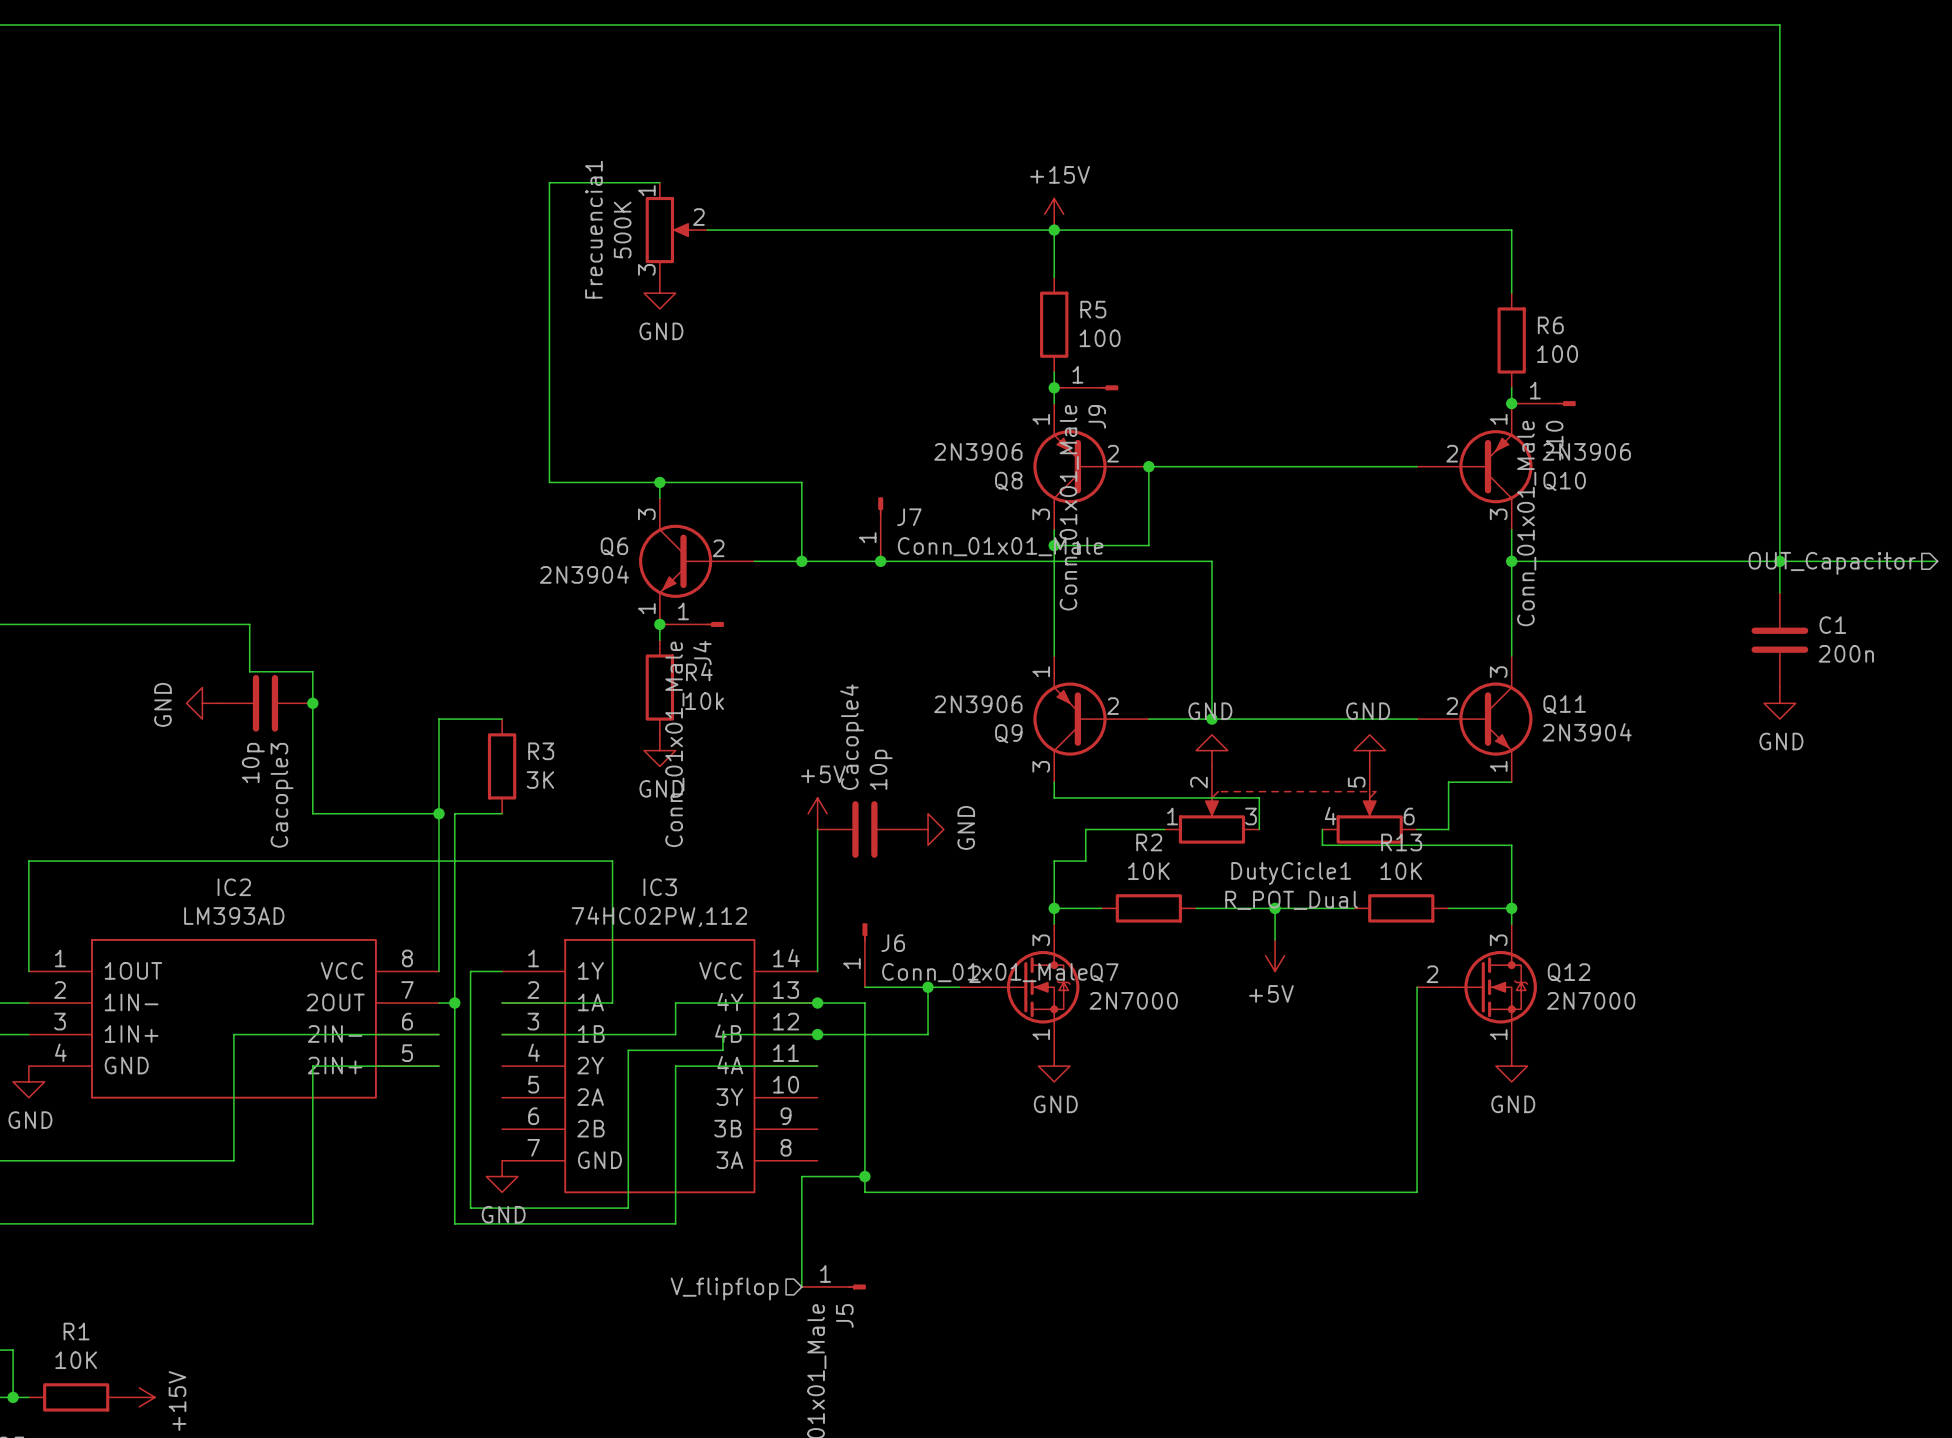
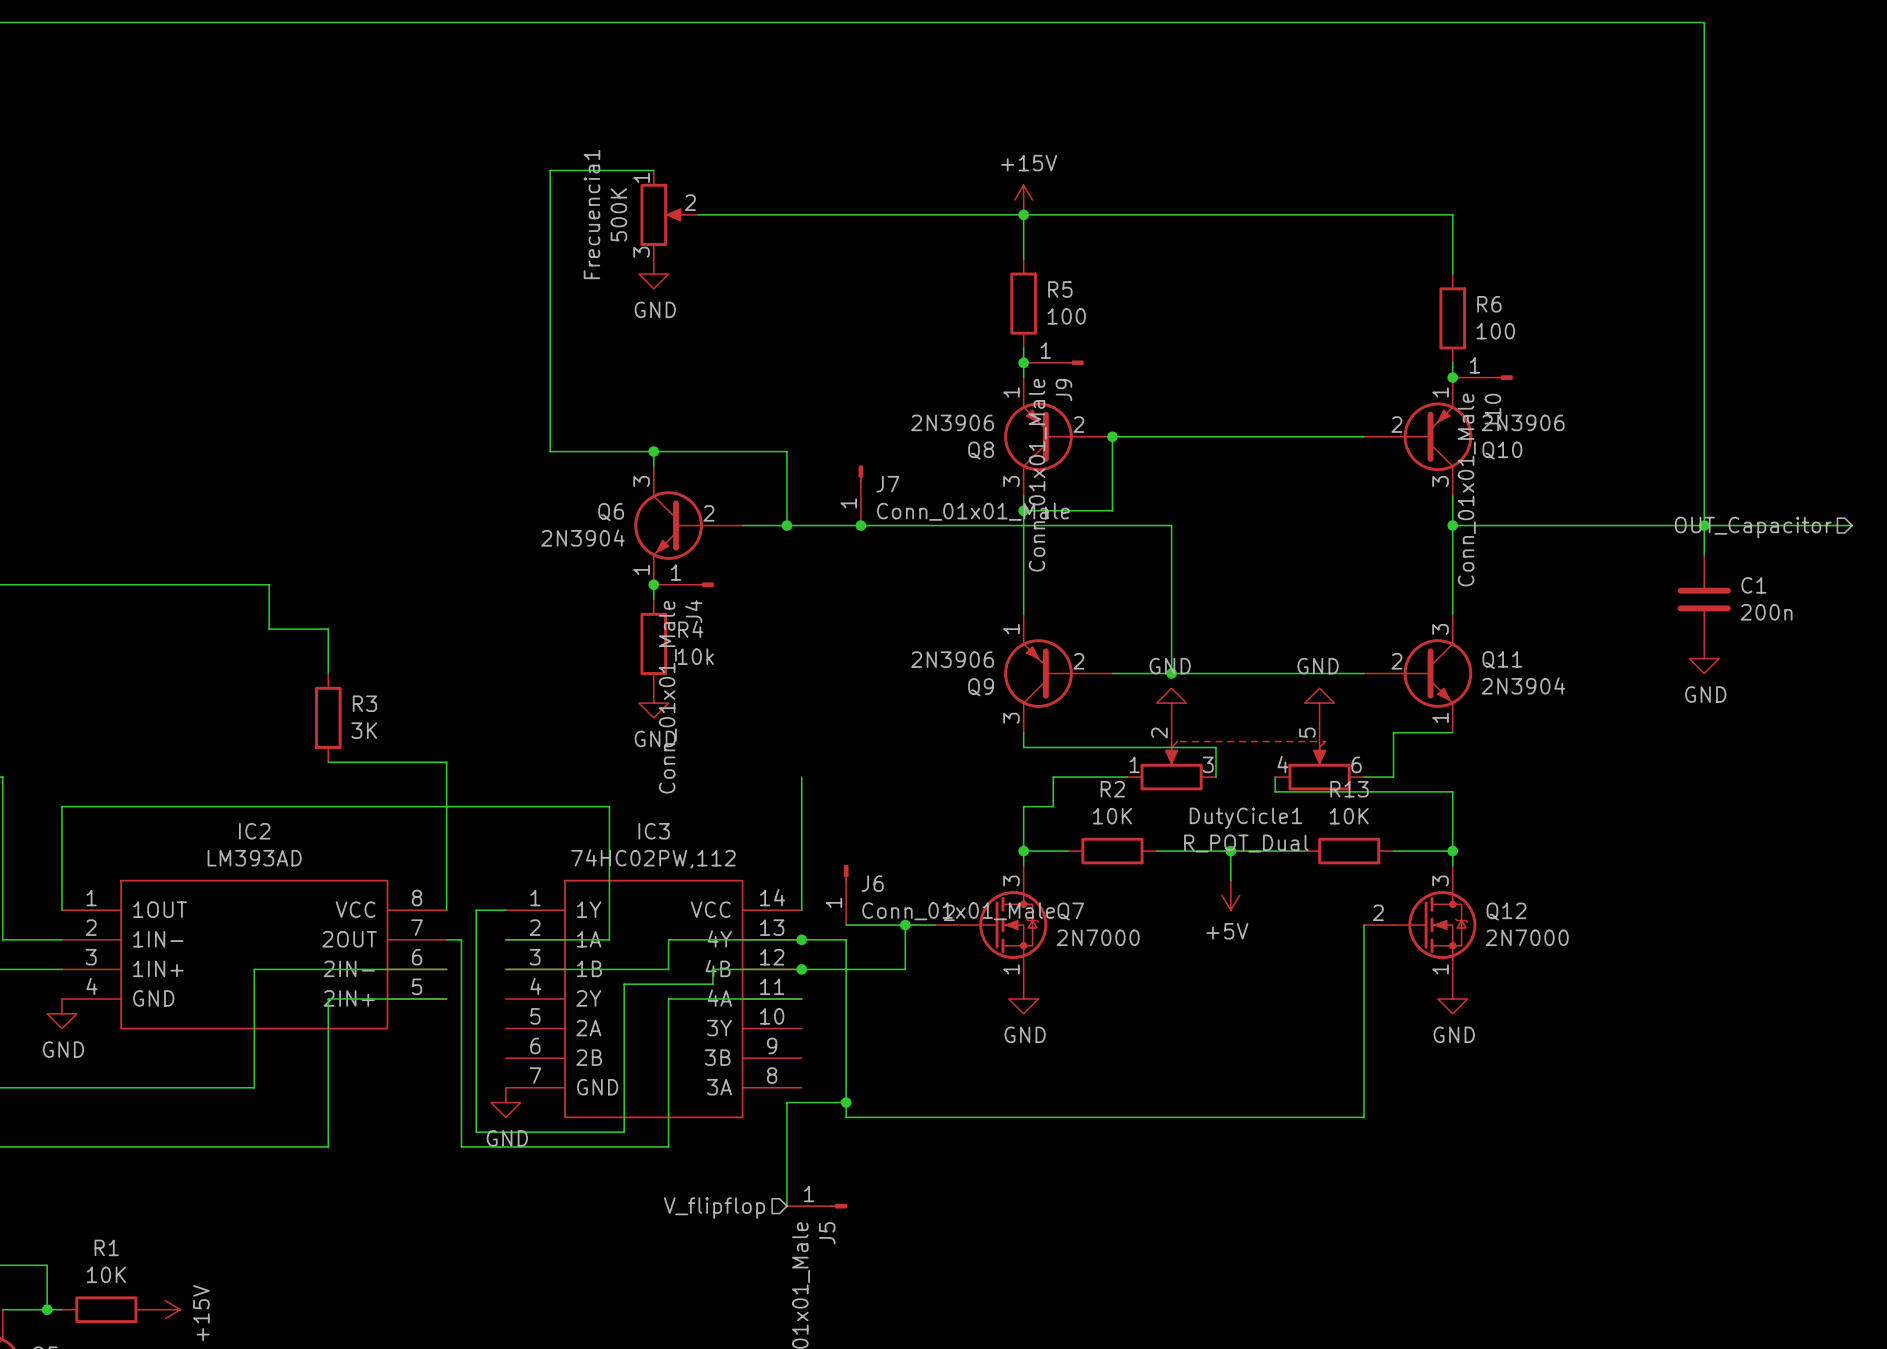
power symbol: GND (202, 703) -> none
Cacople3: 10p (265, 703) -> none
junction: (312, 703) -> none
wire: (312, 719) (312, 813) -> none
wire: (502, 719) (439, 719) (439, 813) -> none
R3 position: (502, 766) -> (328, 717)
junction: (439, 813) -> none
wire: (502, 813) (454, 813) (454, 1003) -> none
power symbol: +5V (817, 813) -> none
Cacople4: 10p (864, 829) -> none
power symbol: GND (928, 829) -> none
junction: (454, 1003) -> none

